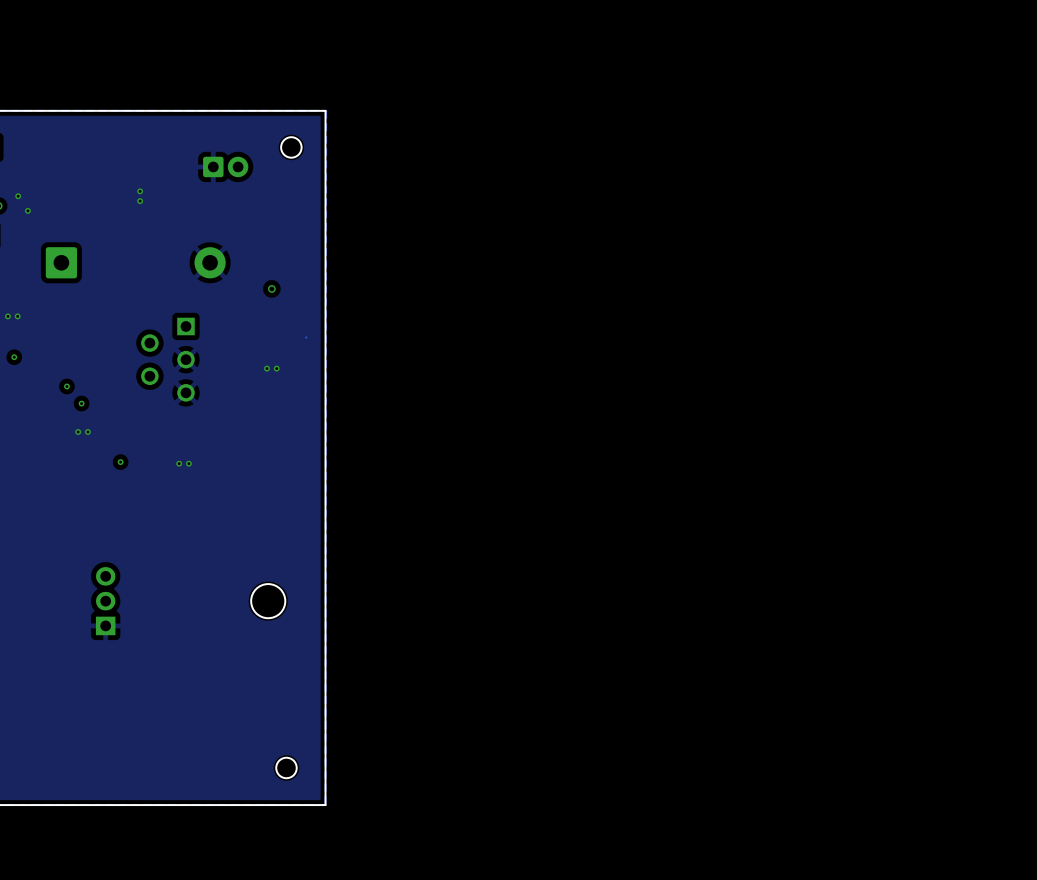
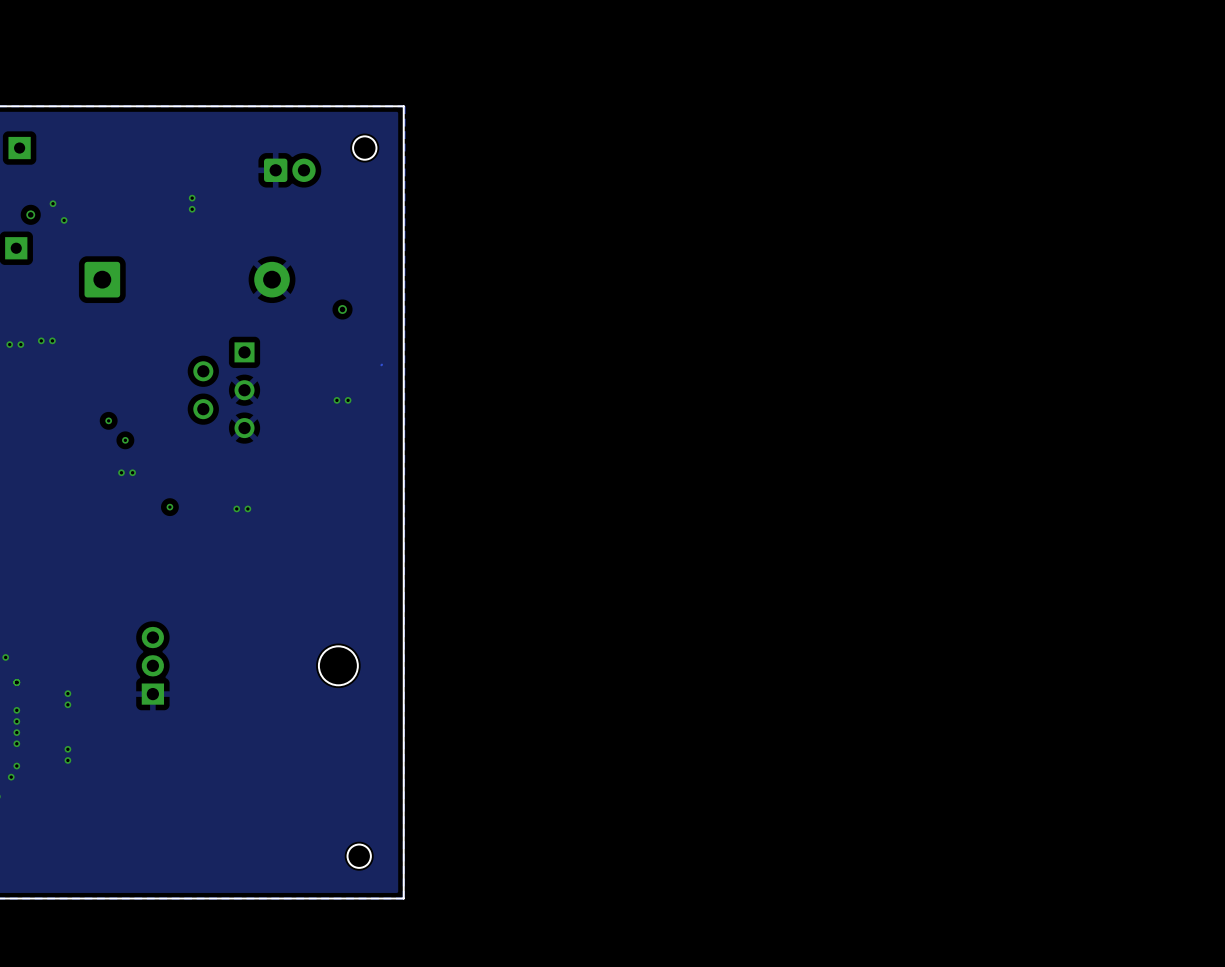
via: (14, 357) -> none
via: none -> (67, 693)
via: none -> (67, 704)
via: none -> (67, 749)
via: none -> (67, 760)

